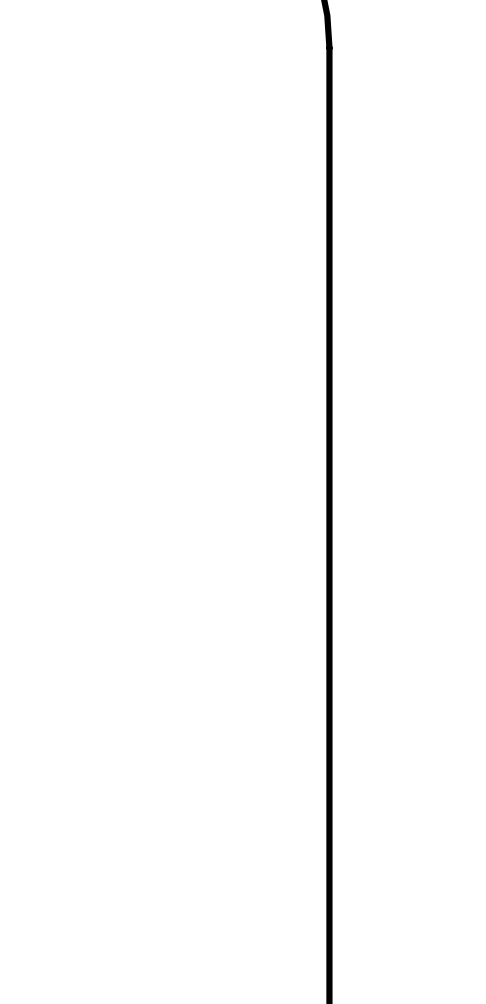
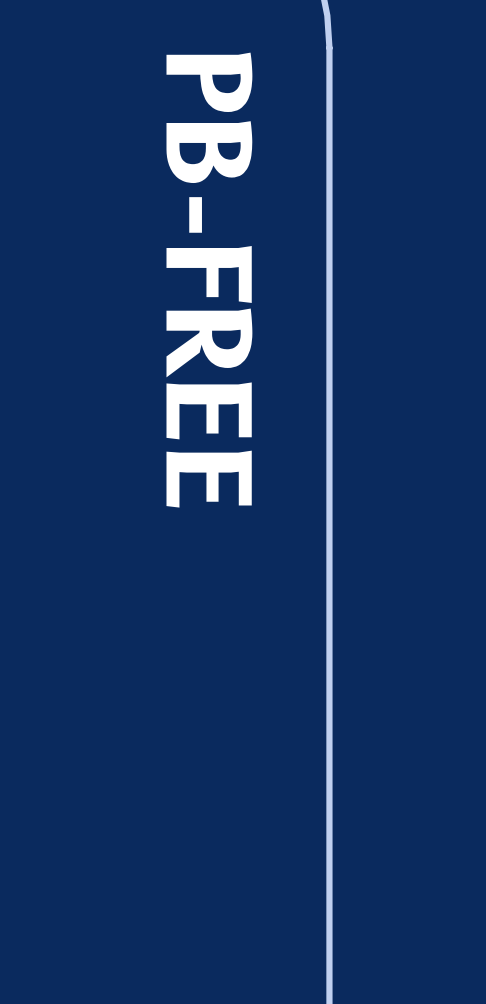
text: none -> PB-FREE (209, 280)

